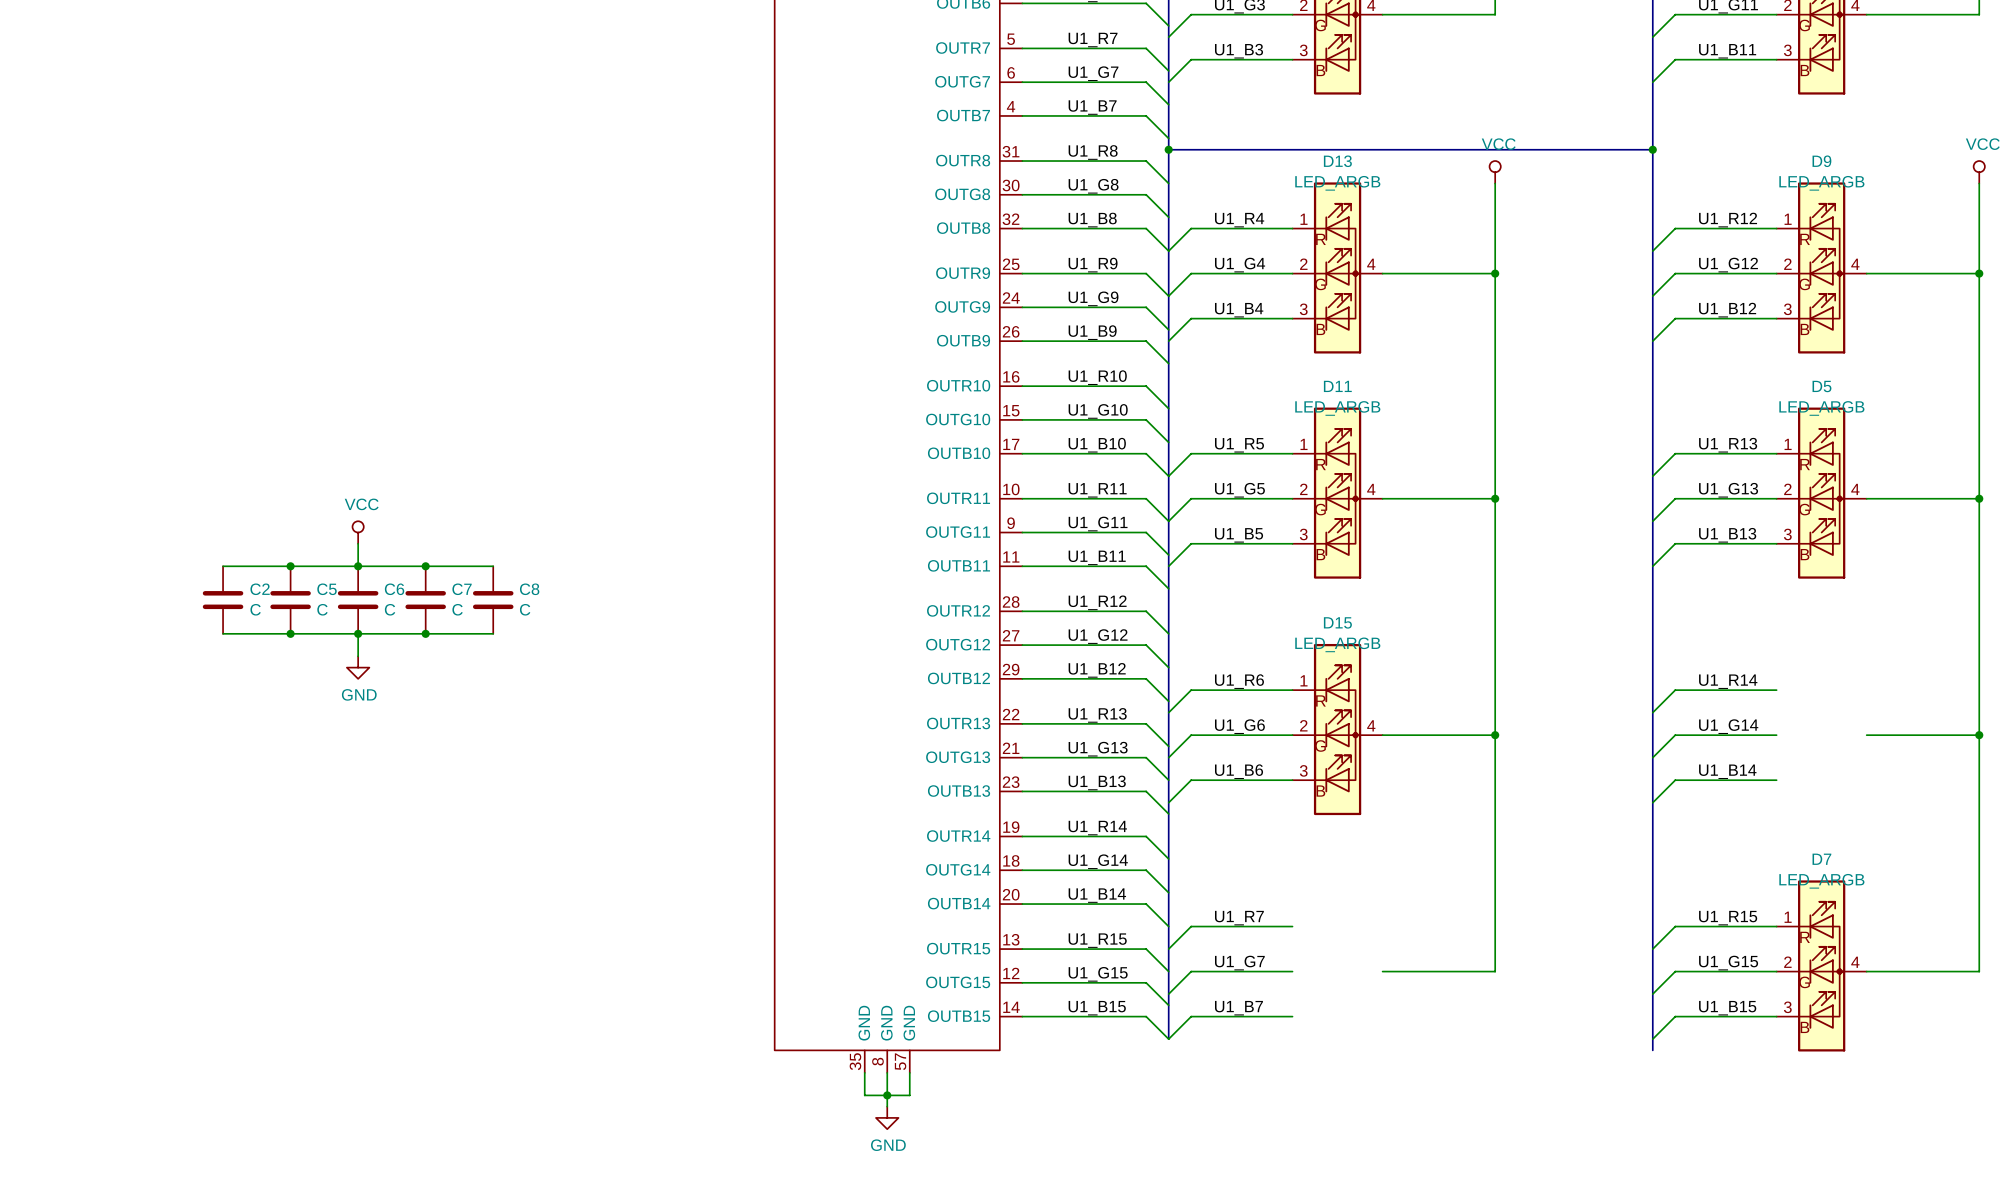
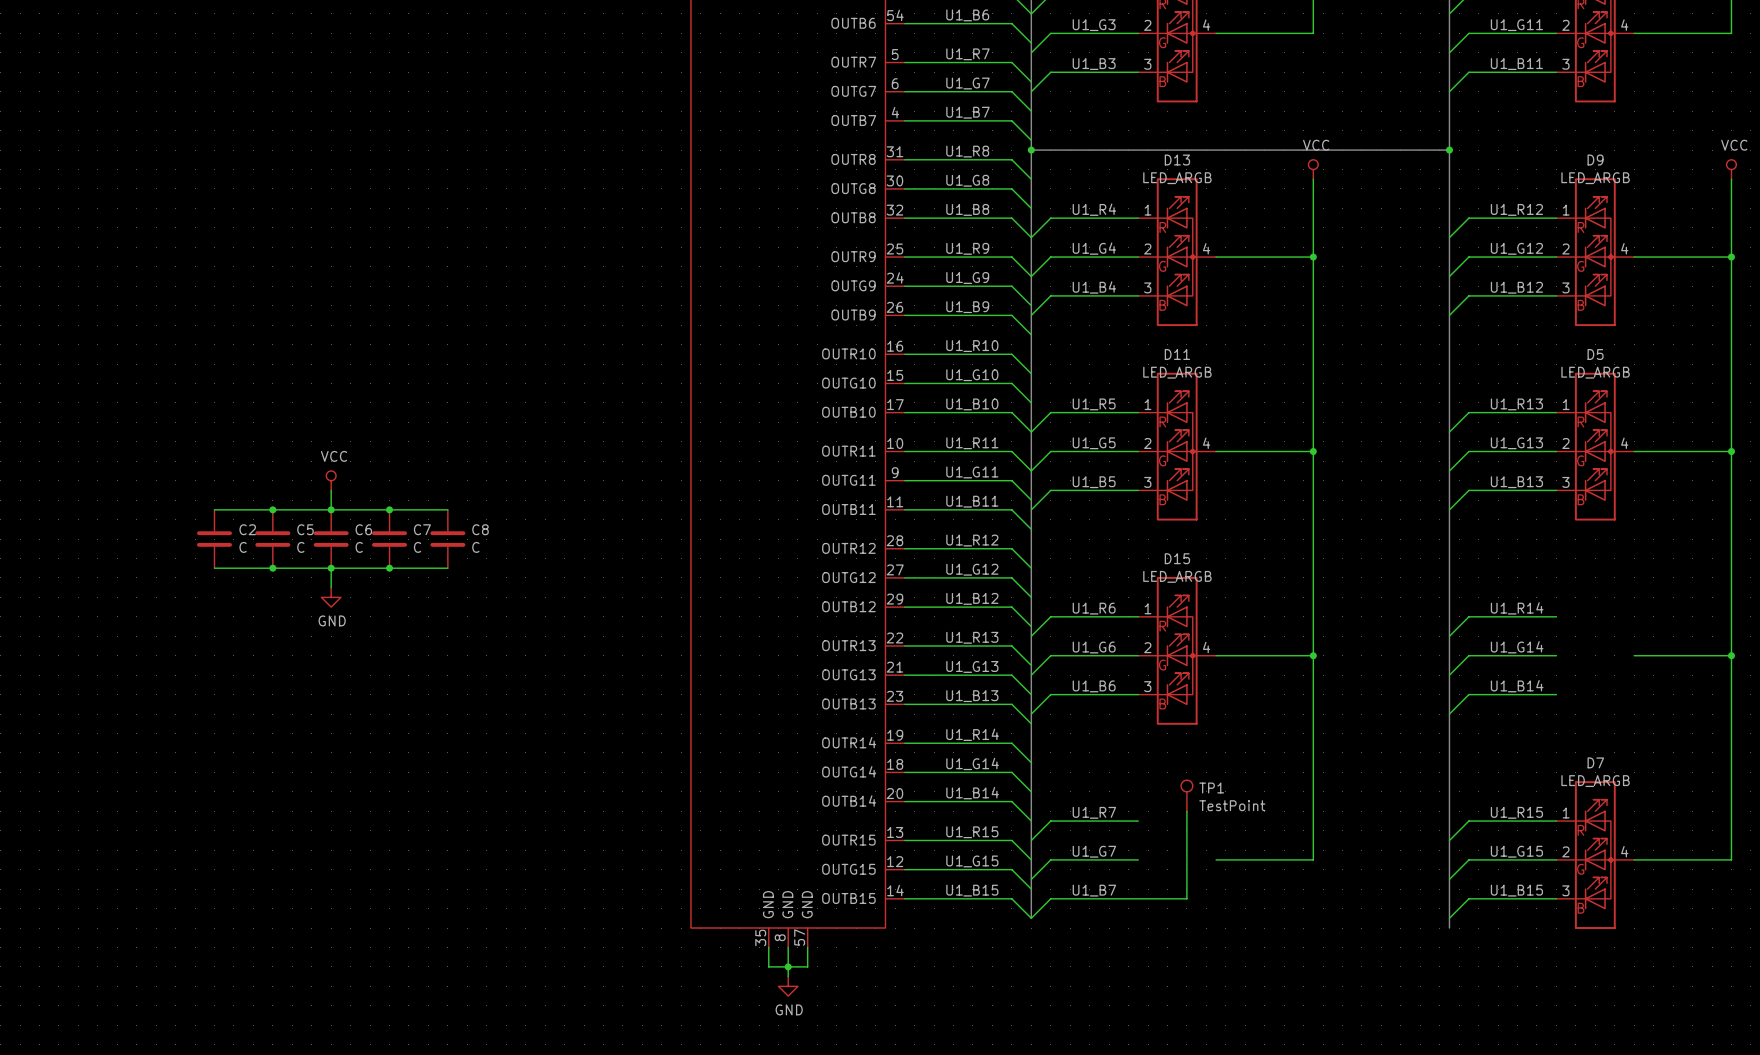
TP1: none -> TestPoint (1186, 795)
wire: none -> (1186, 811) (1186, 898) (1138, 898)

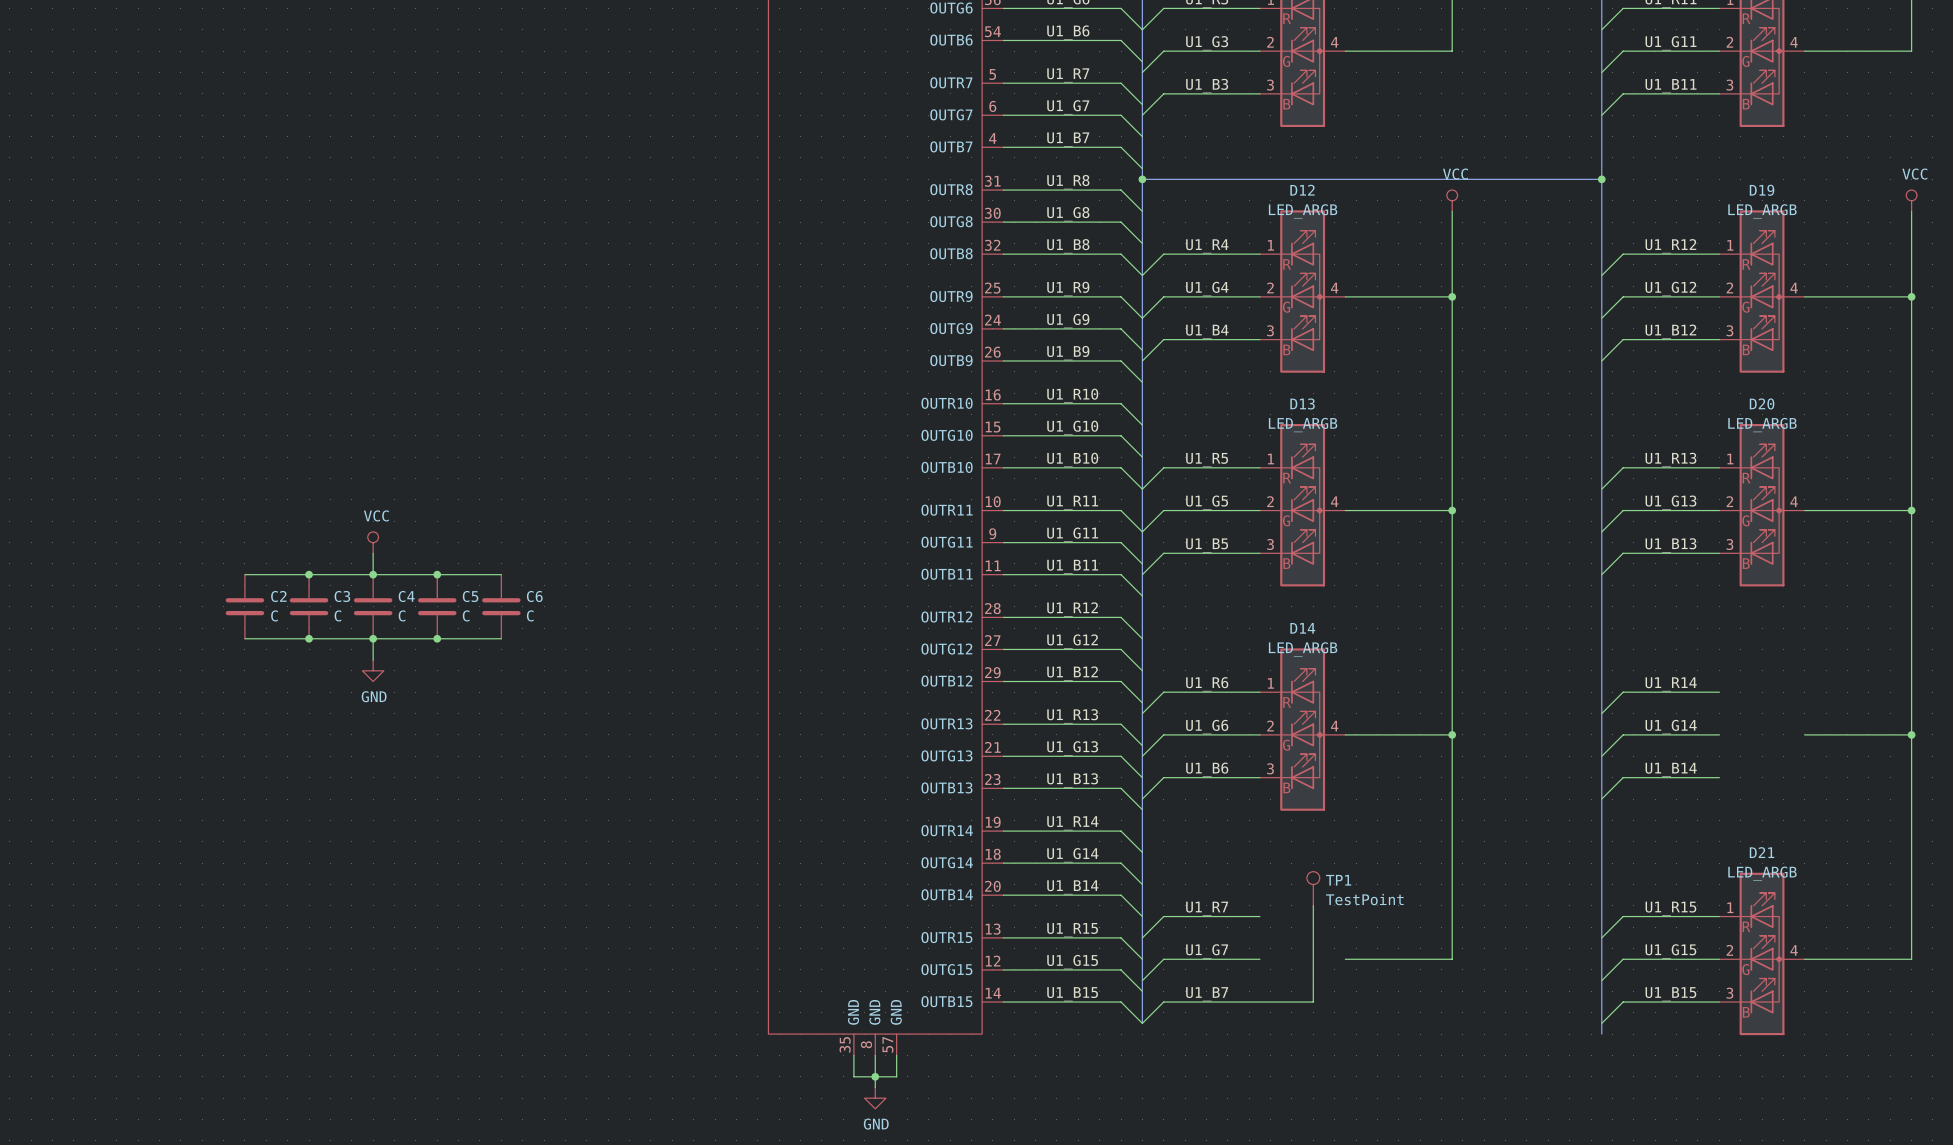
D13 name: D13 (1177, 160) -> D12 (1302, 190)
D9 name: D9 (1595, 160) -> D19 (1762, 190)
D11 name: D11 (1177, 354) -> D13 (1302, 403)
D5 name: D5 (1595, 354) -> D20 (1762, 403)
C5 name: C5 (305, 529) -> C3 (342, 596)
C6 name: C6 (363, 529) -> C4 (406, 596)
C7 name: C7 (422, 529) -> C5 (470, 596)
C8 name: C8 (480, 529) -> C6 (534, 596)
D15 name: D15 (1177, 558) -> D14 (1302, 628)
D7 name: D7 (1595, 762) -> D21 (1762, 852)

